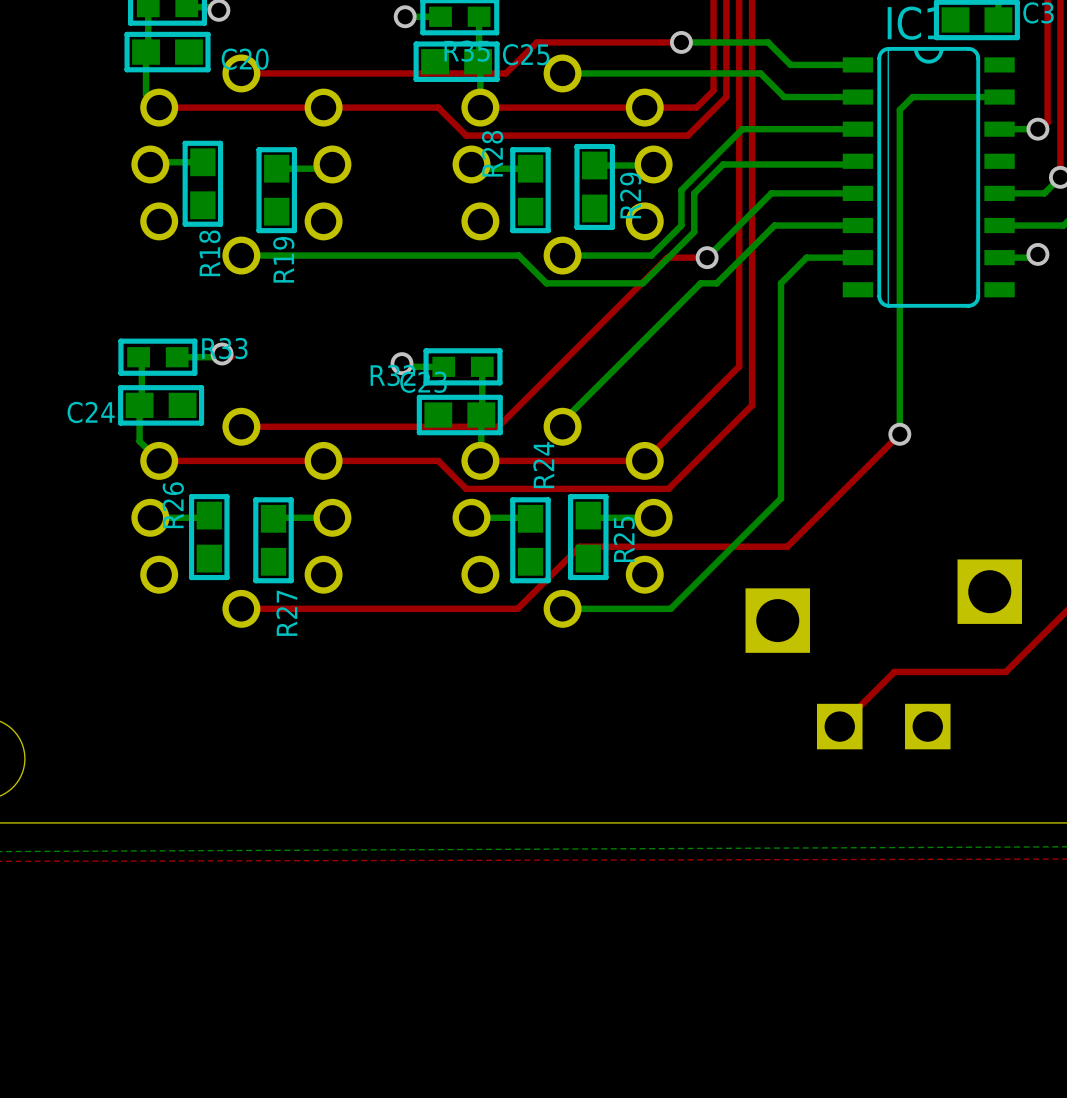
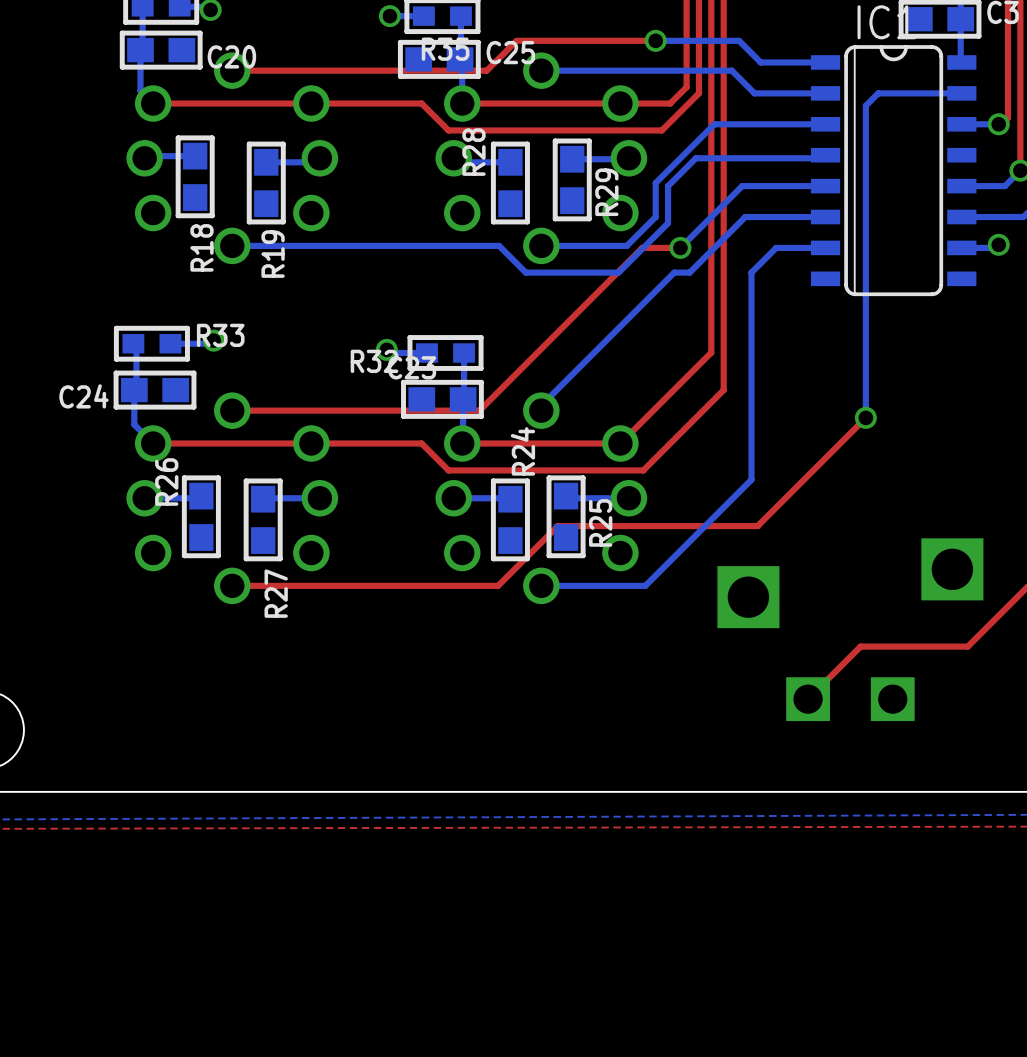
bottom track: none -> (960, 19) (961, 62)

